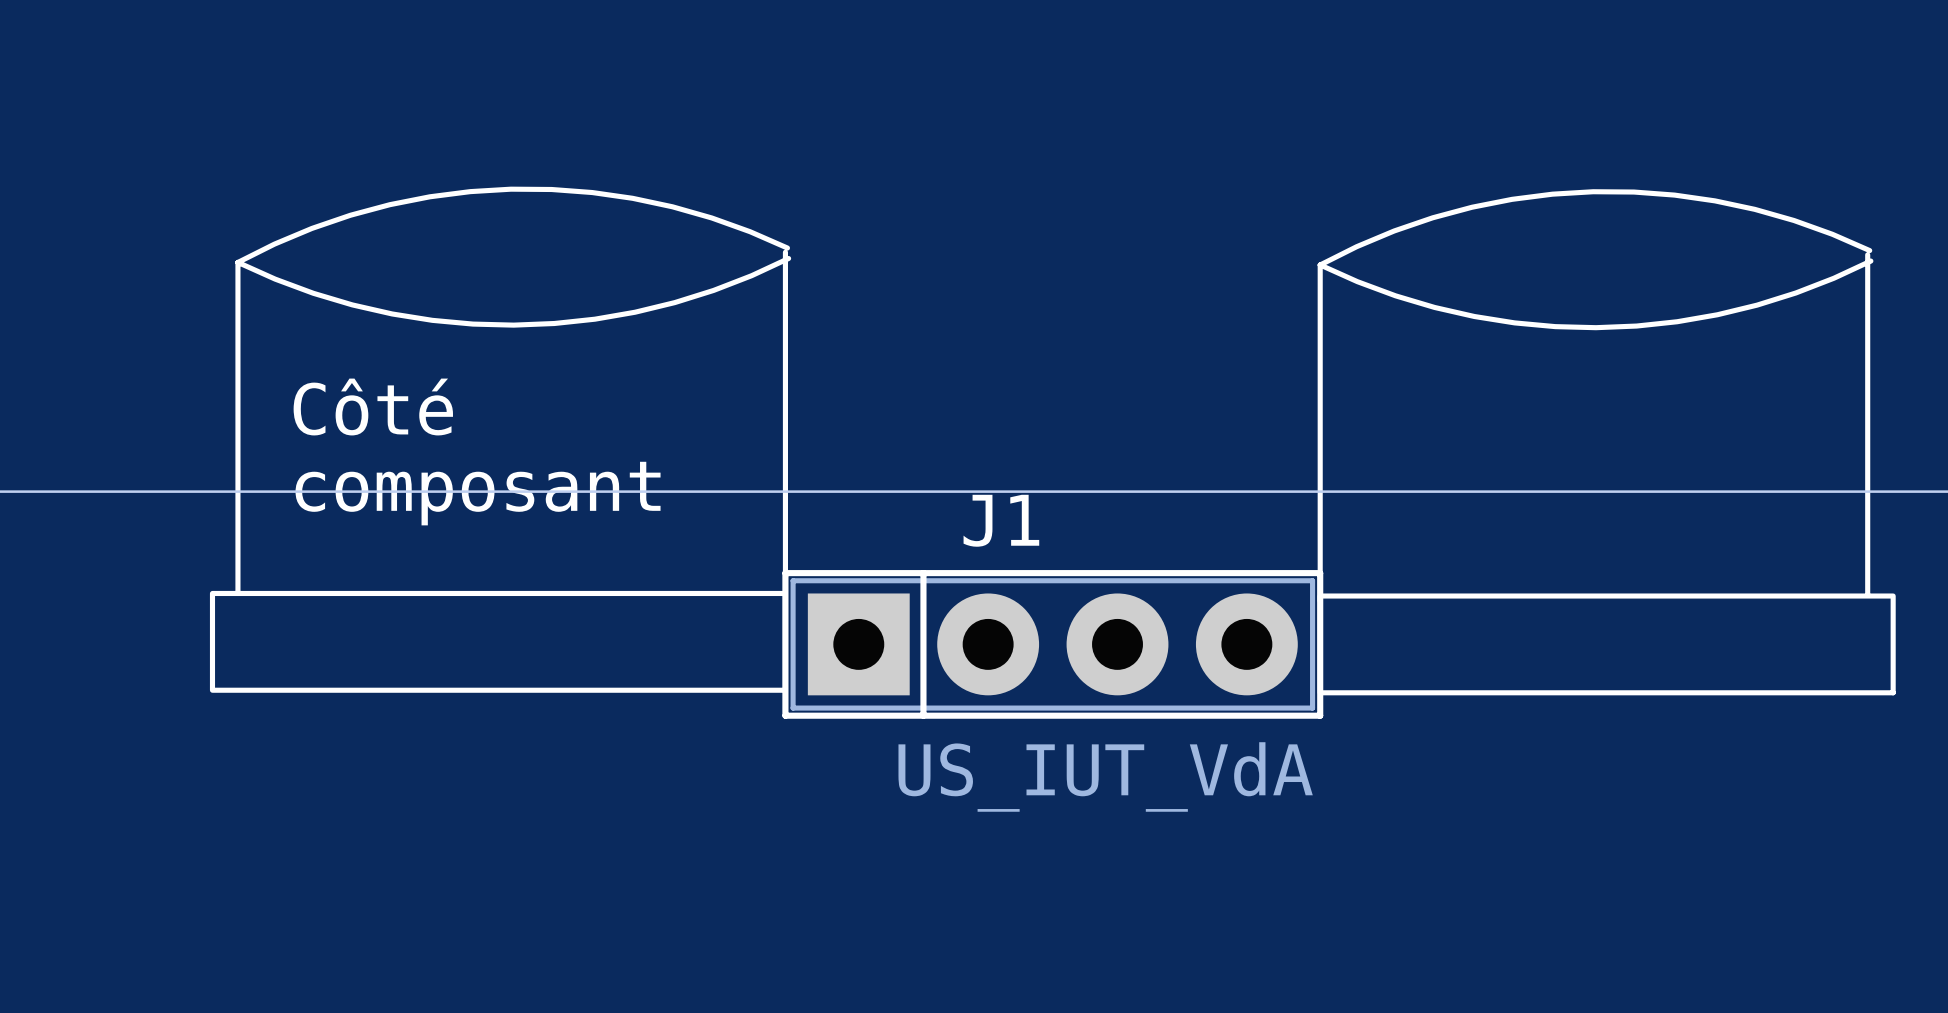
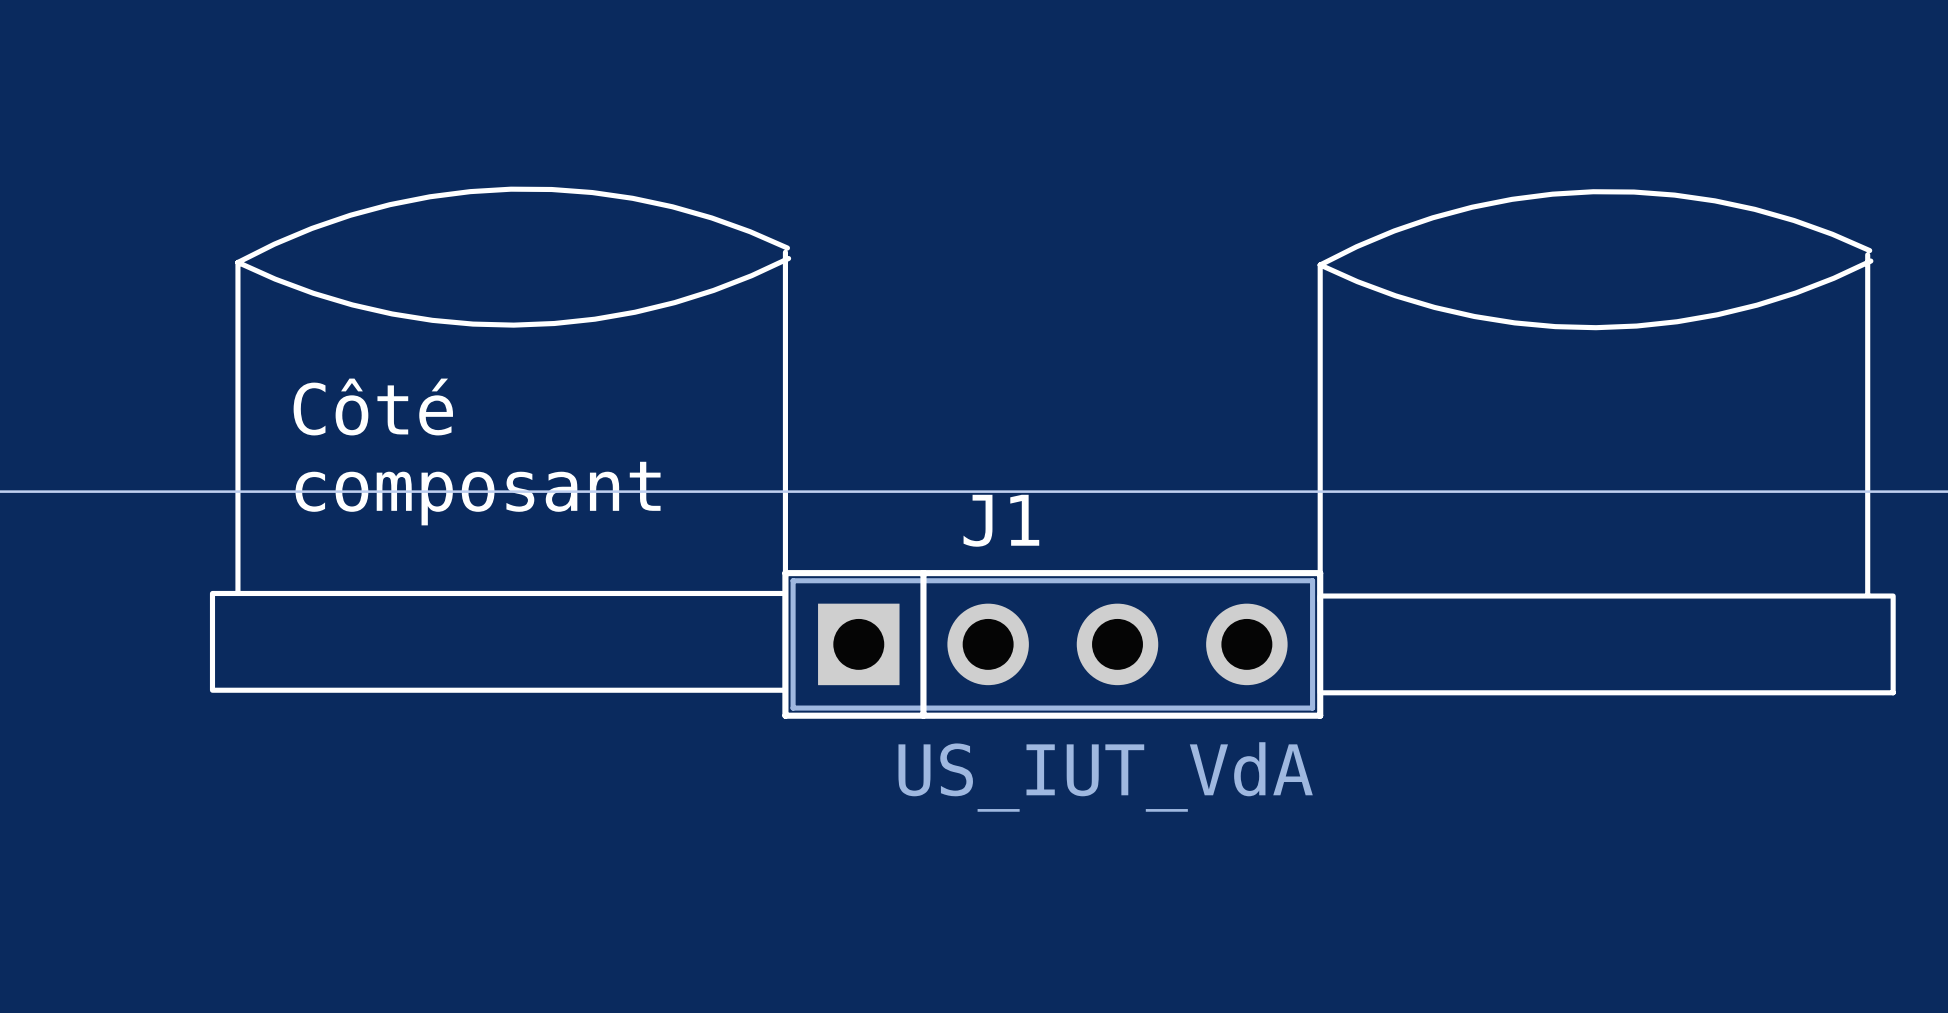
J1 footprint: [209, 186, 1896, 719] -> [209, 186, 1896, 719]

